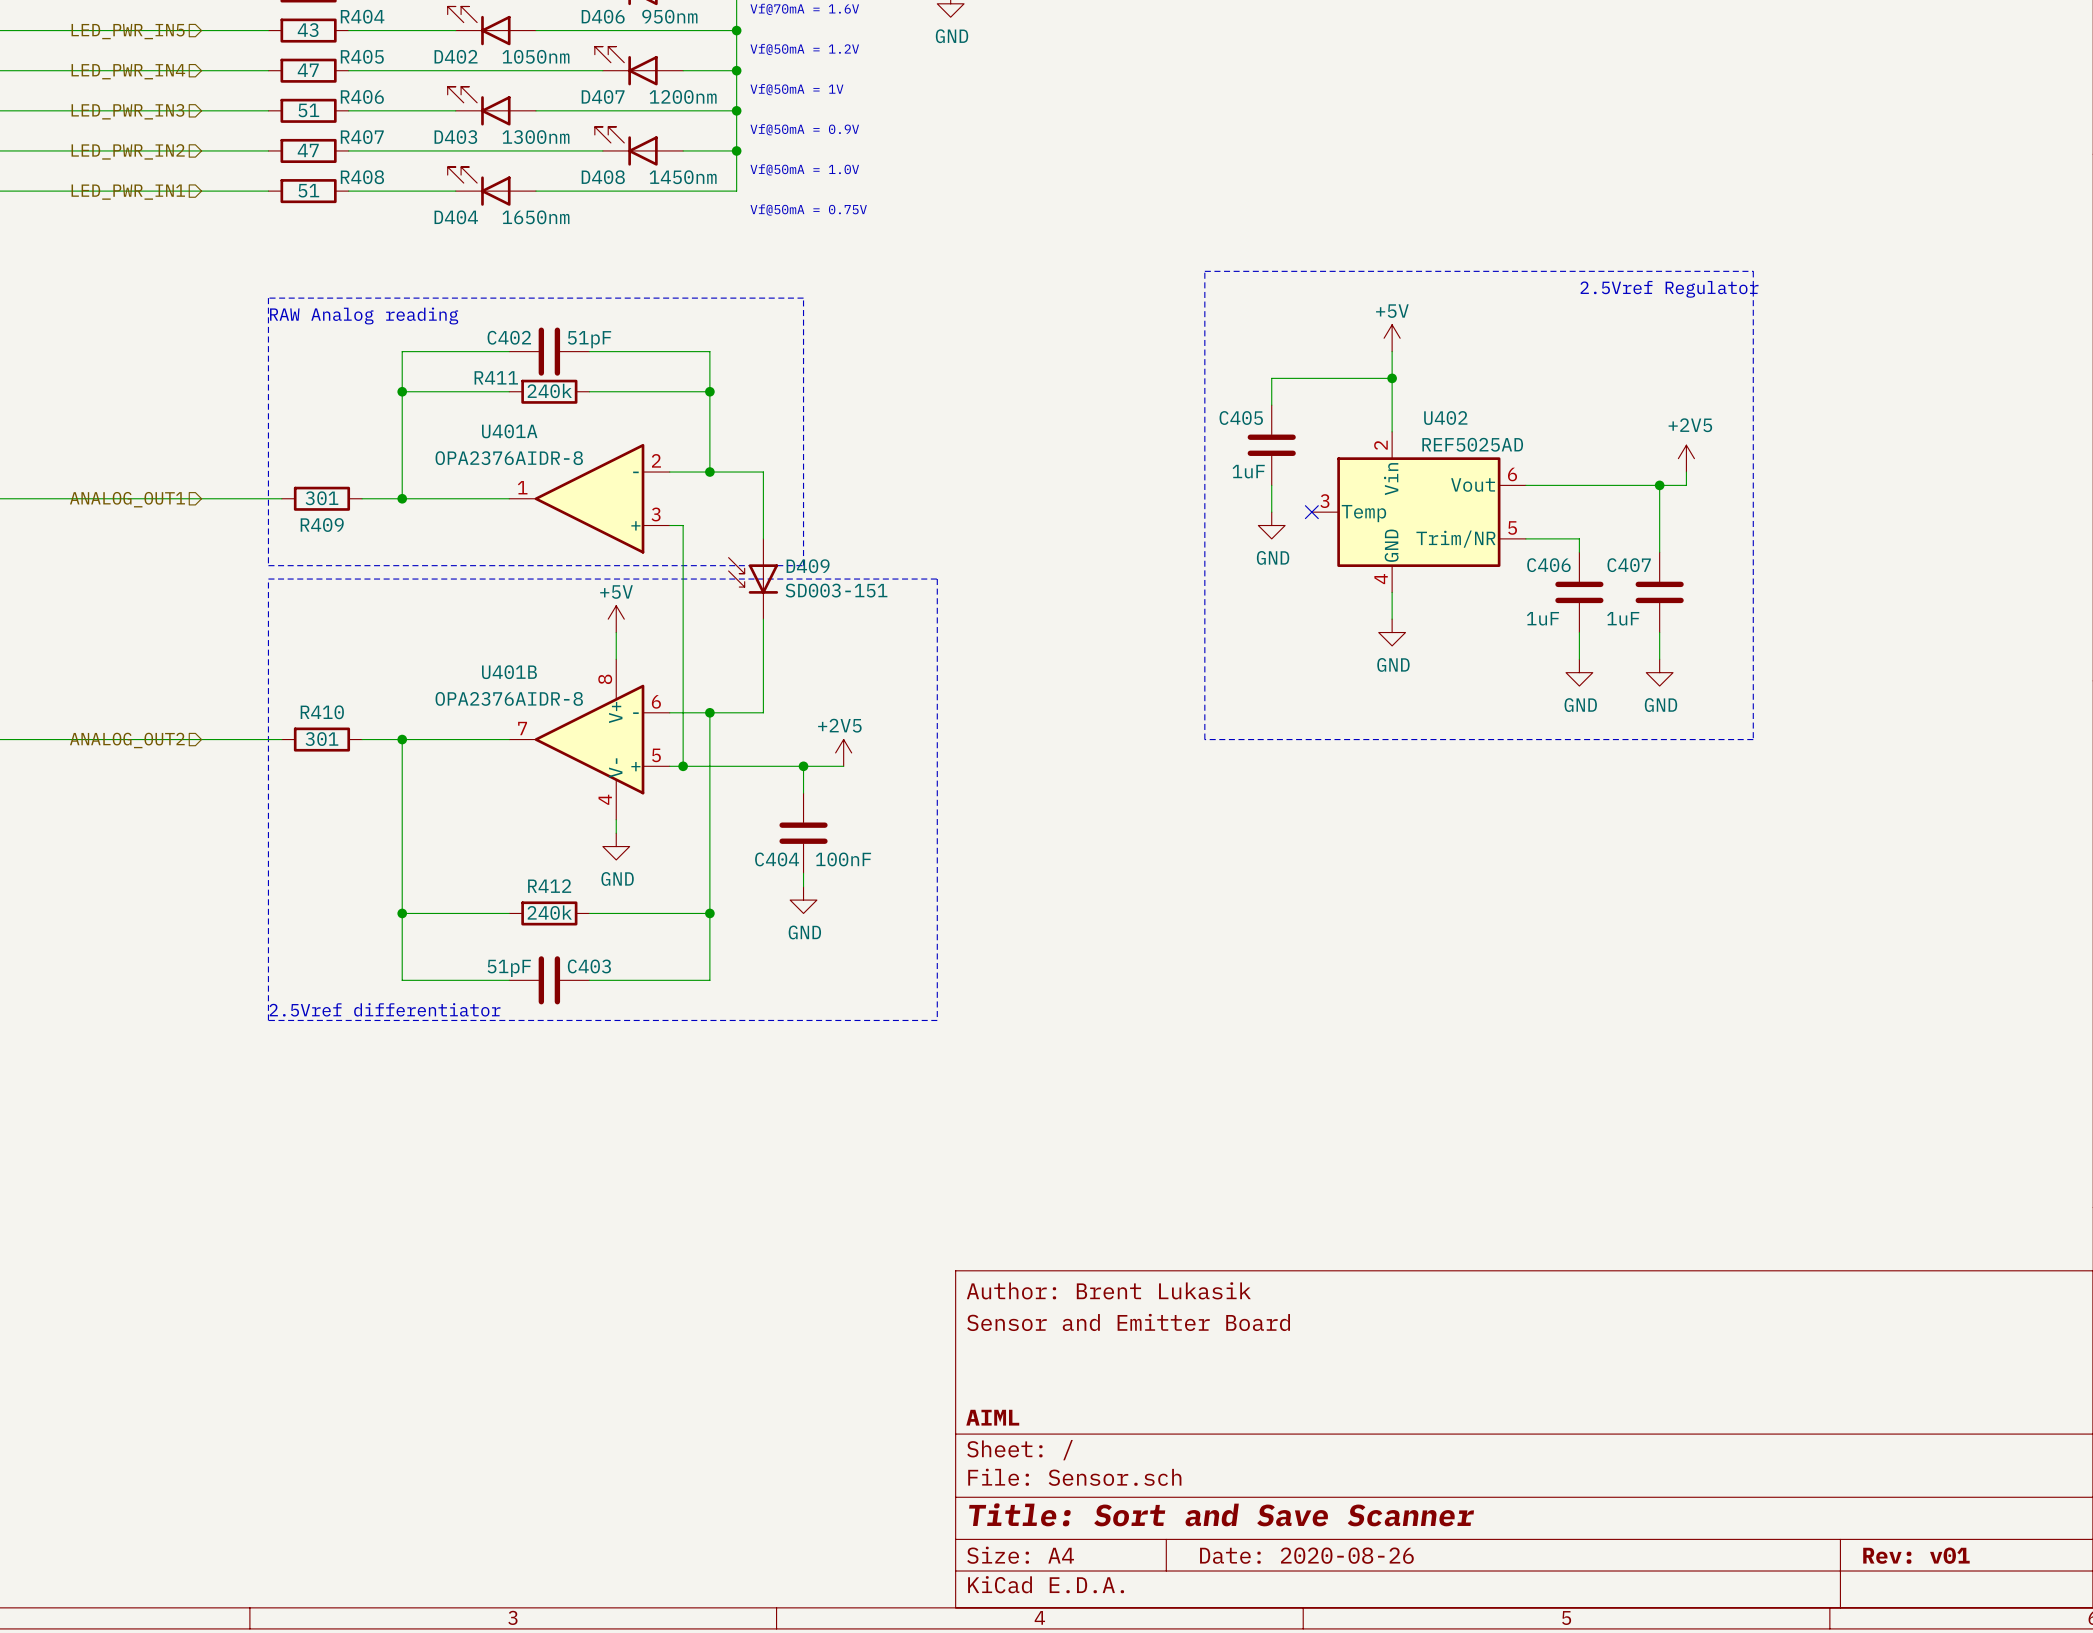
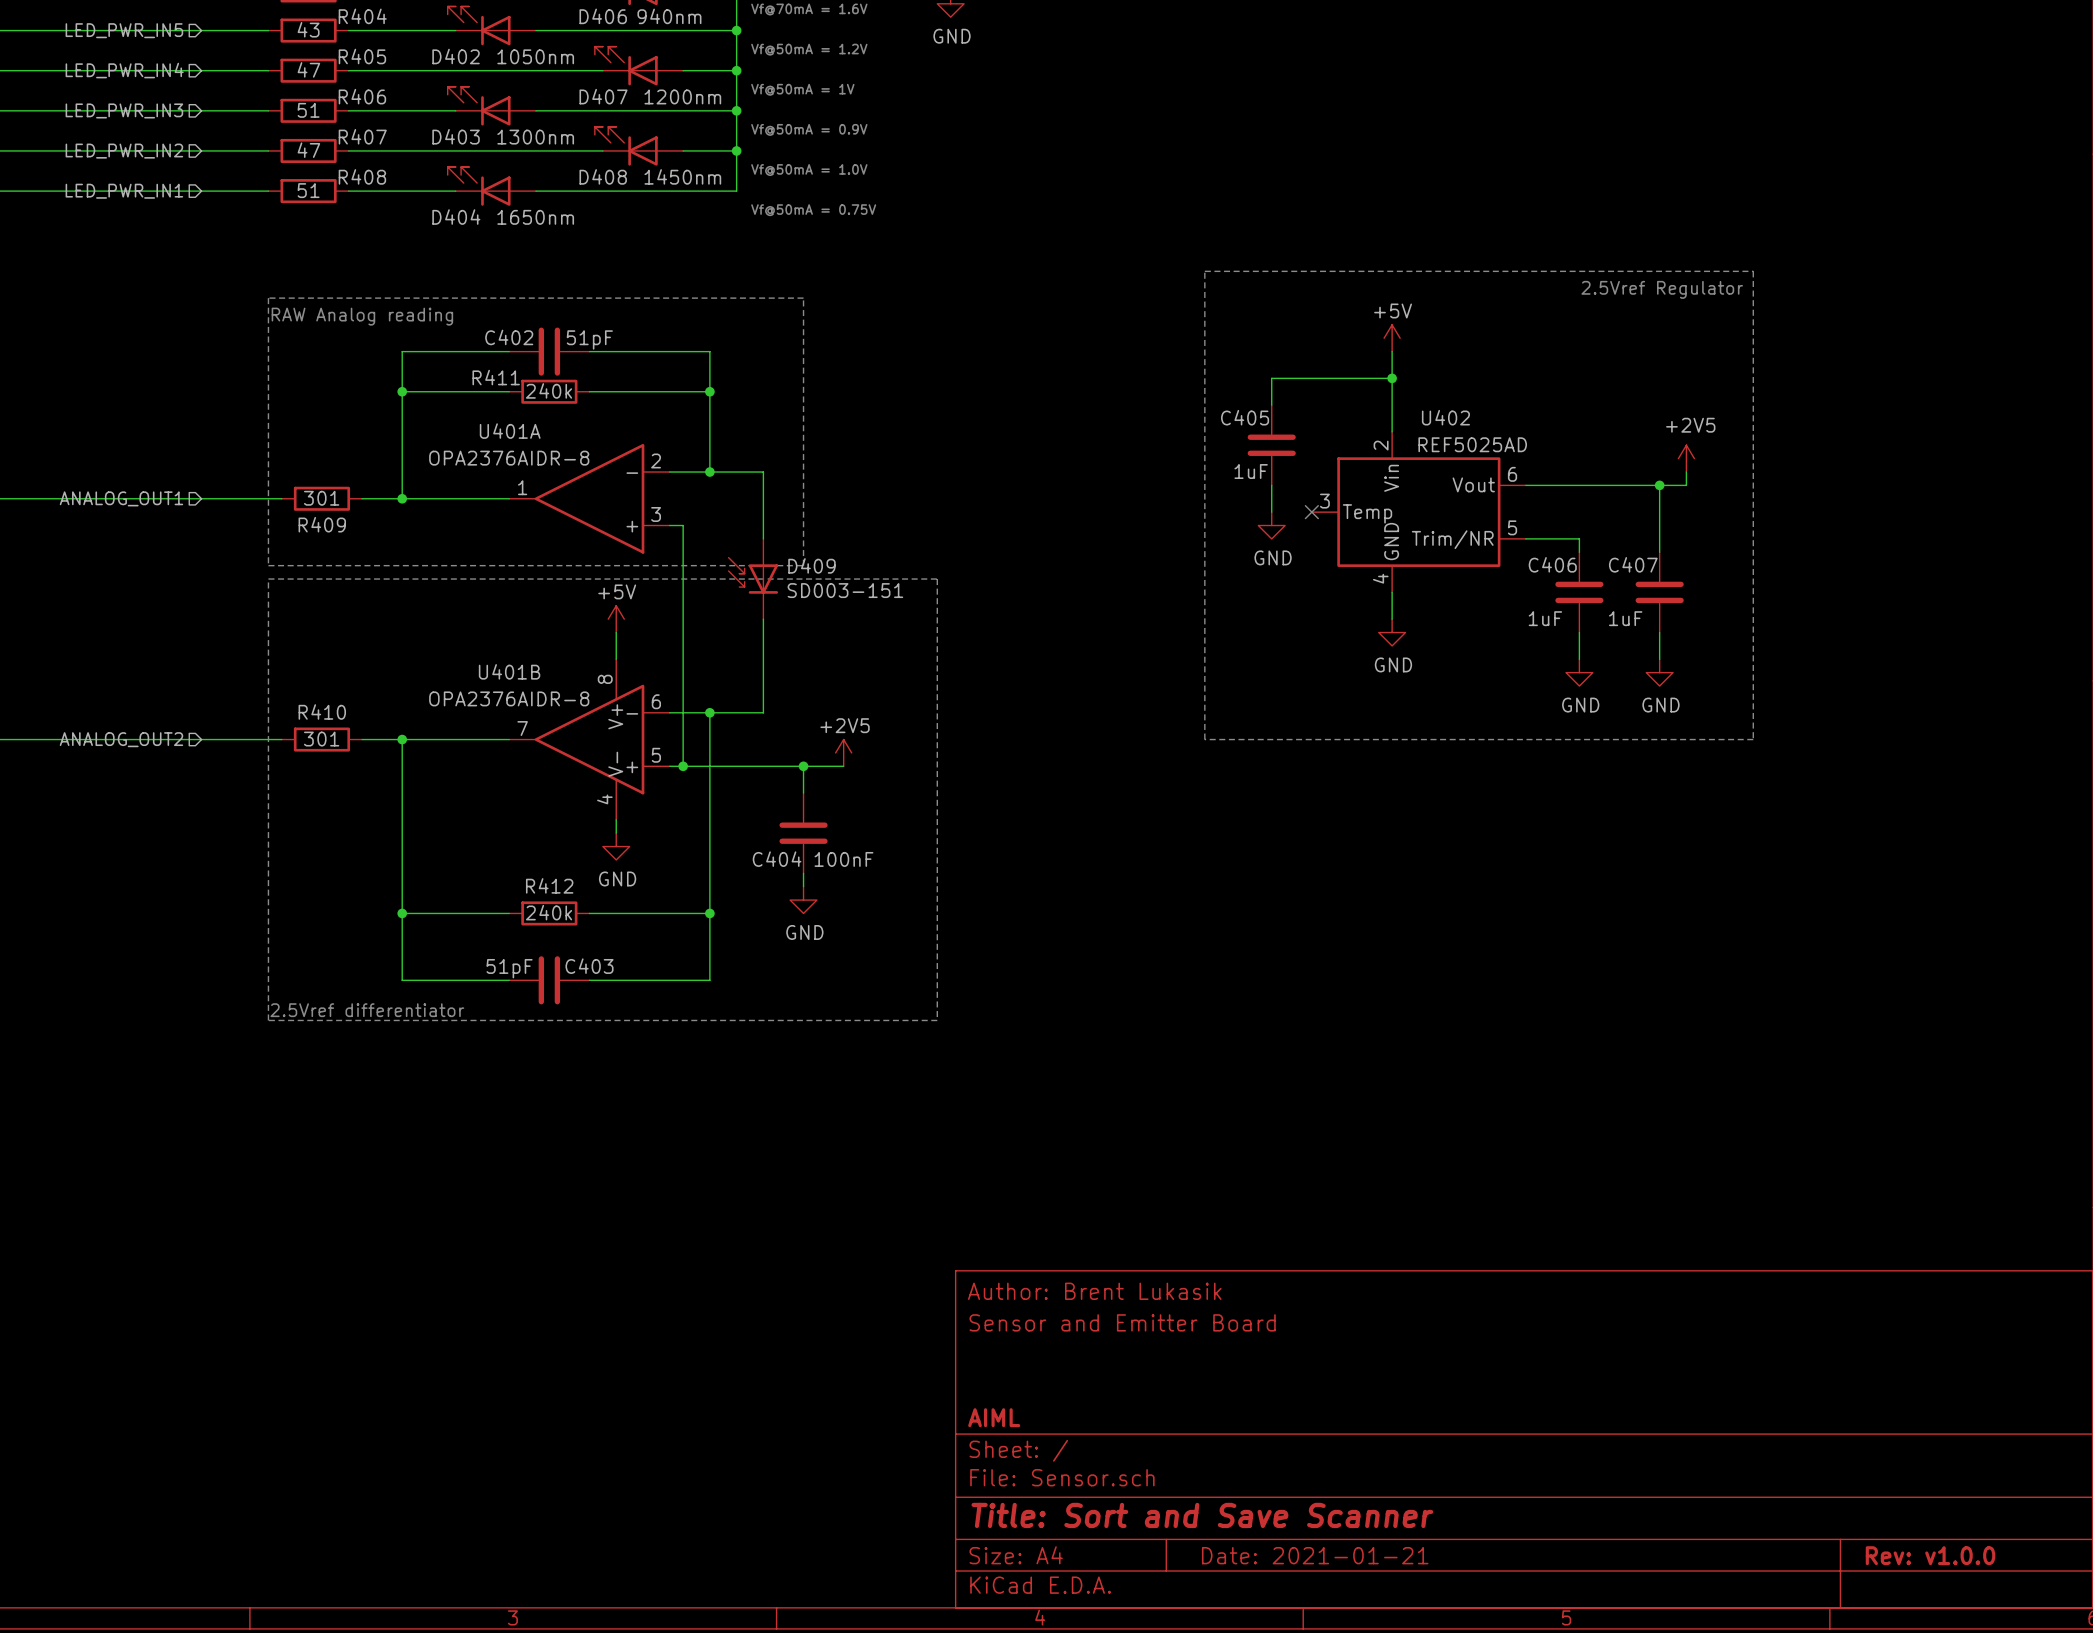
D406 value: 950nm (669, 16) -> 940nm (669, 16)
title block: Date: 2020-08-26 (1306, 1555) -> Date: 2021-01-21 (1315, 1555)
title block: Rev: v01 (1916, 1555) -> Rev: v1.0.0 (1930, 1555)

